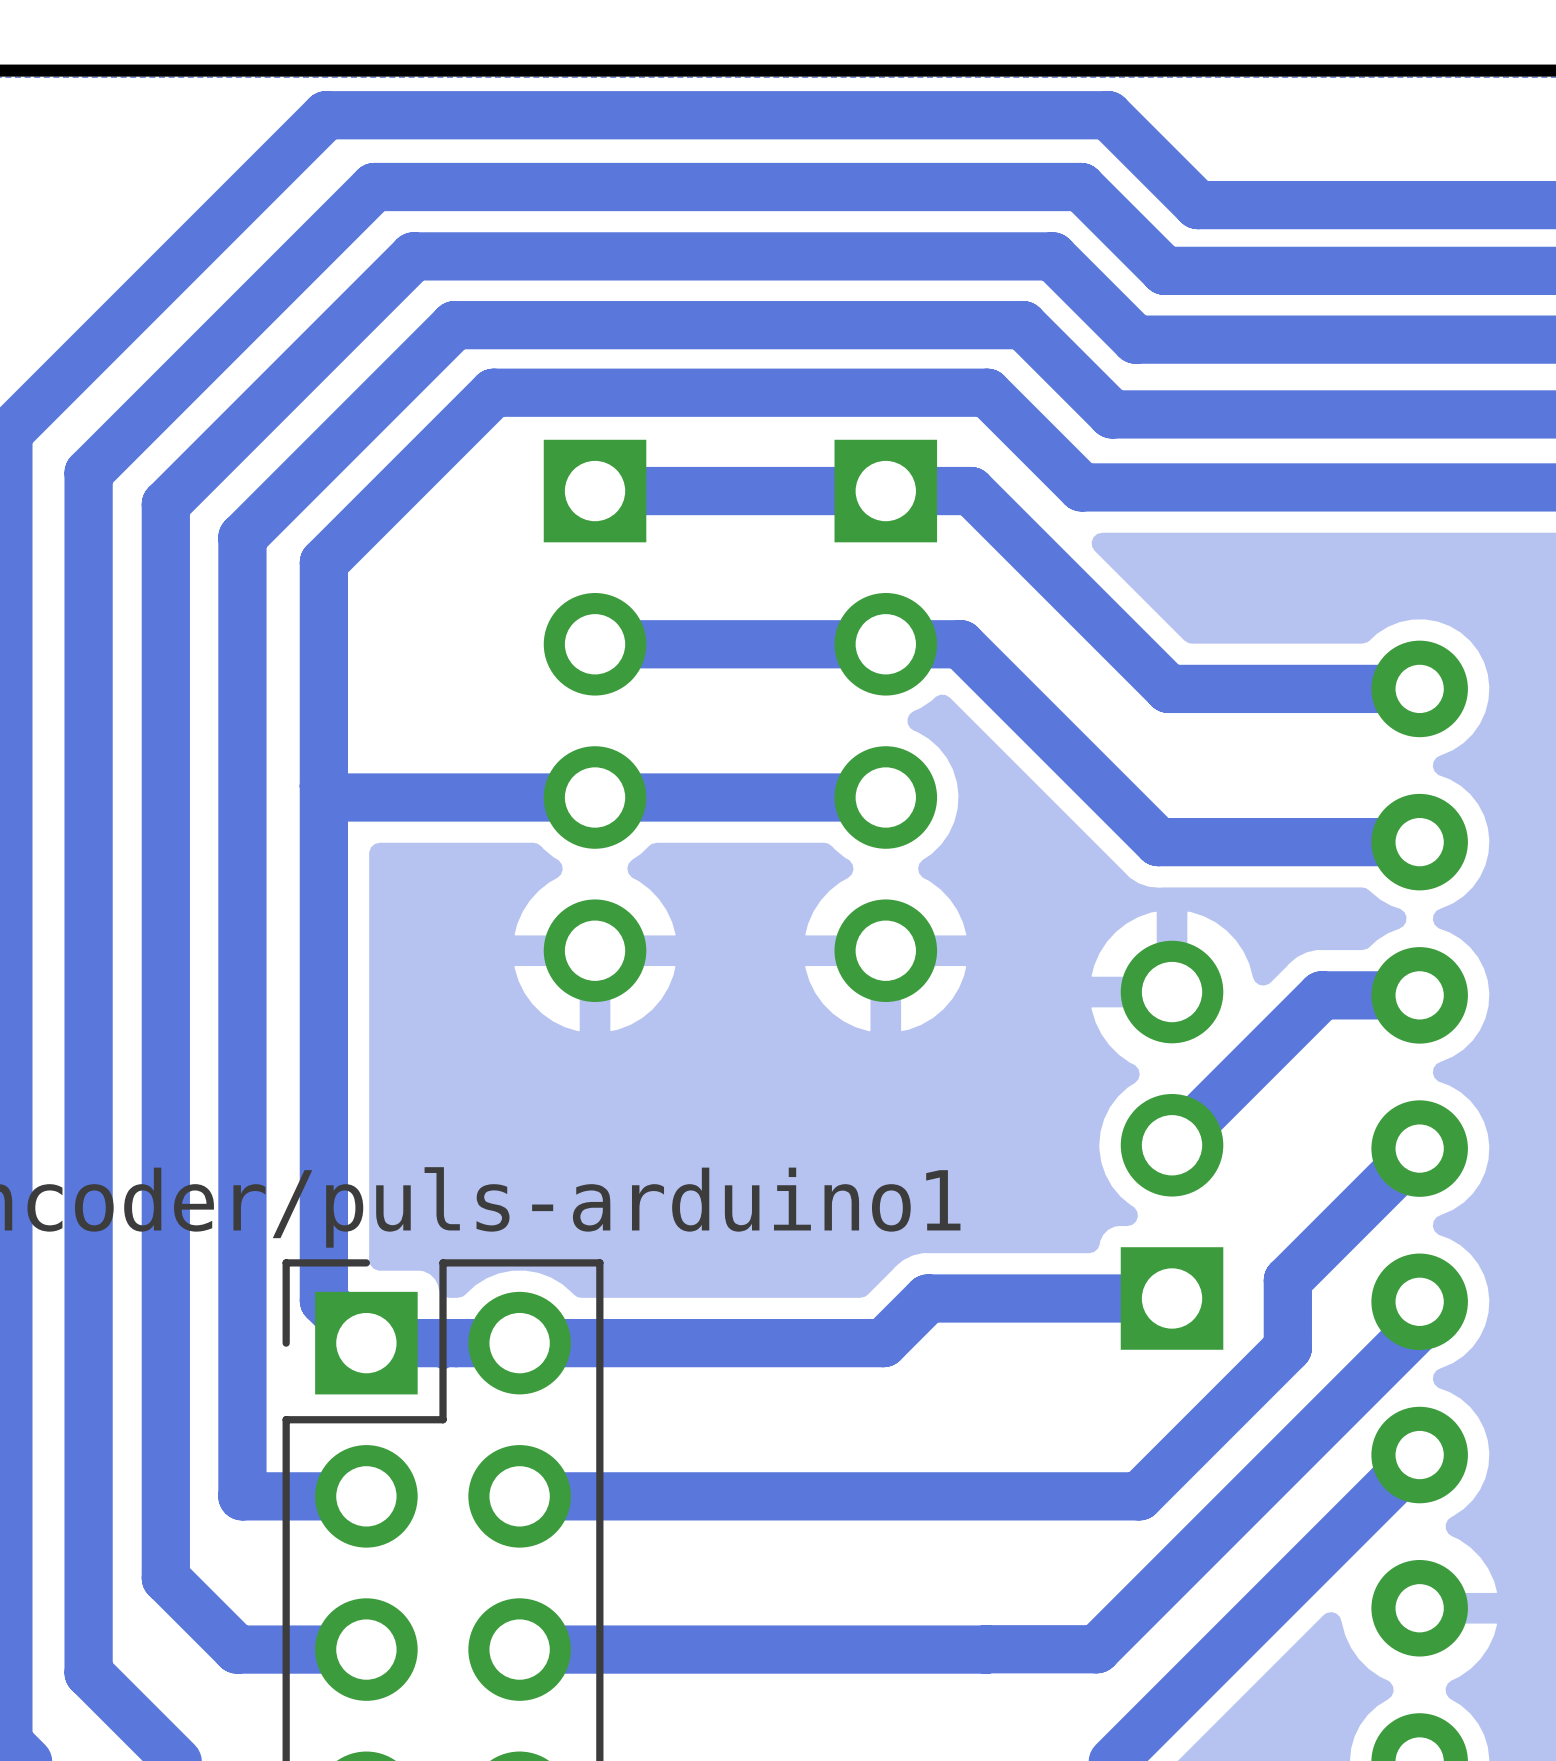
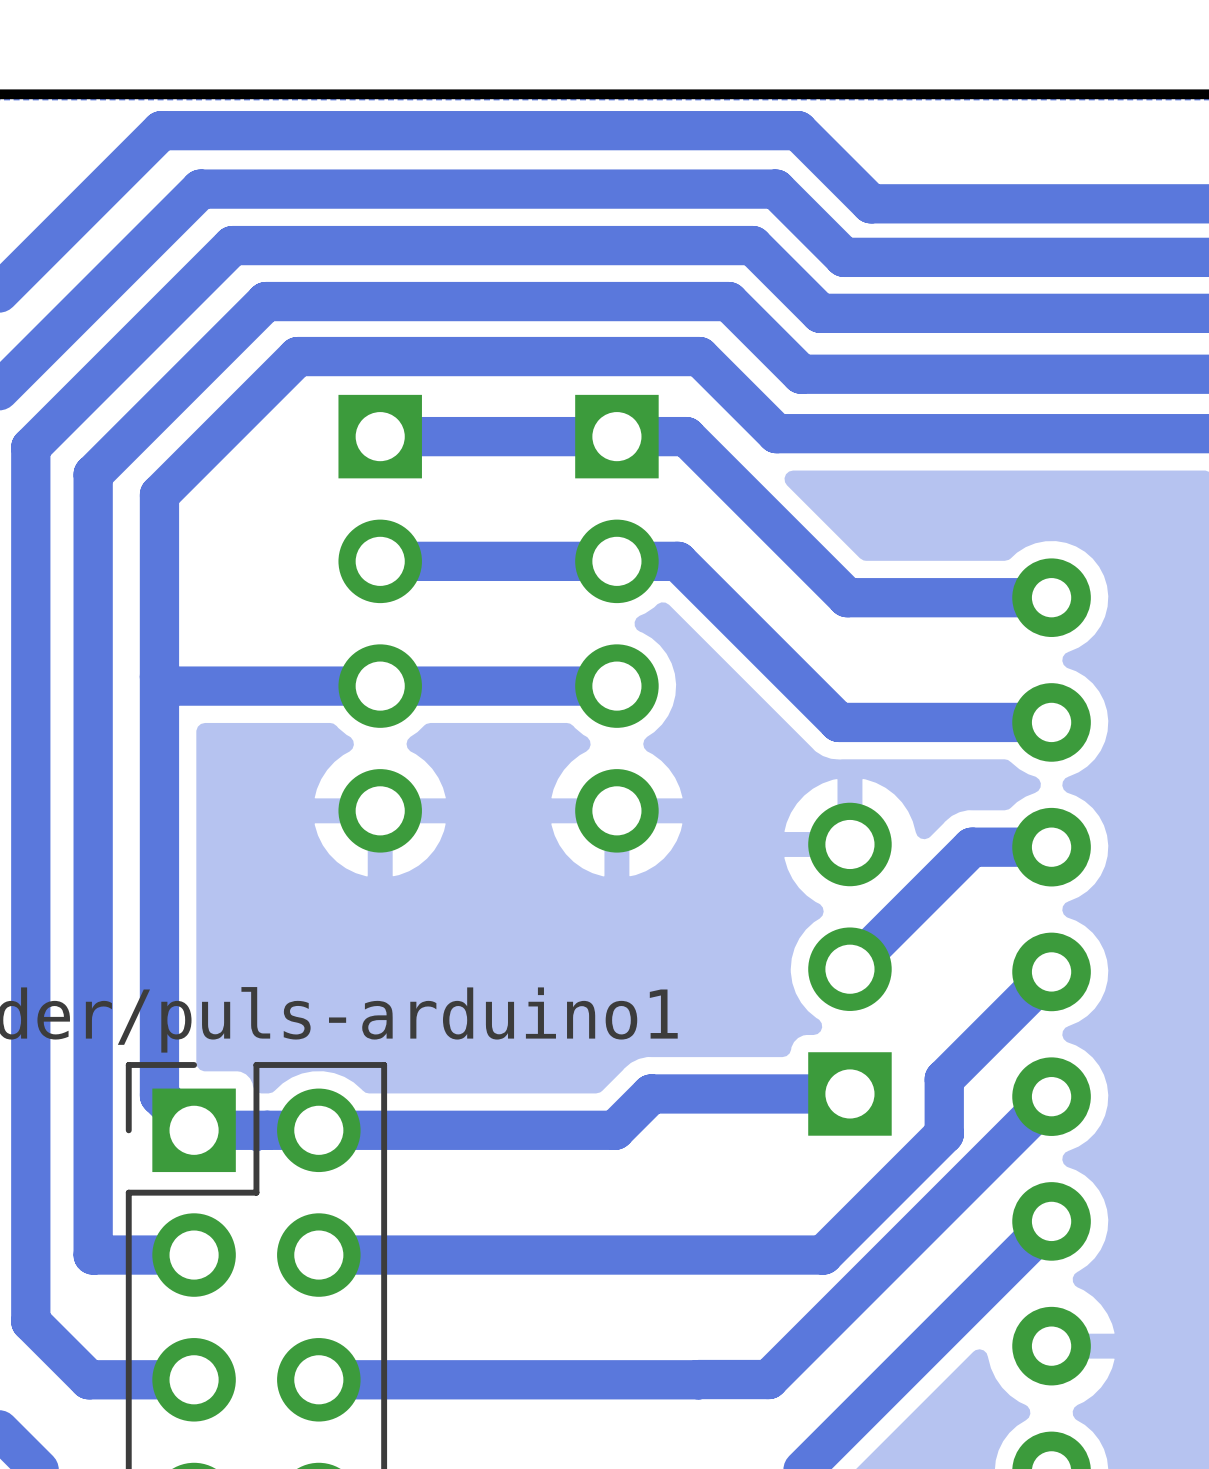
track: (1419, 1301) (1419, 1326) (1096, 1649) (1072, 1649) -> (1051, 1096) (768, 1379)

